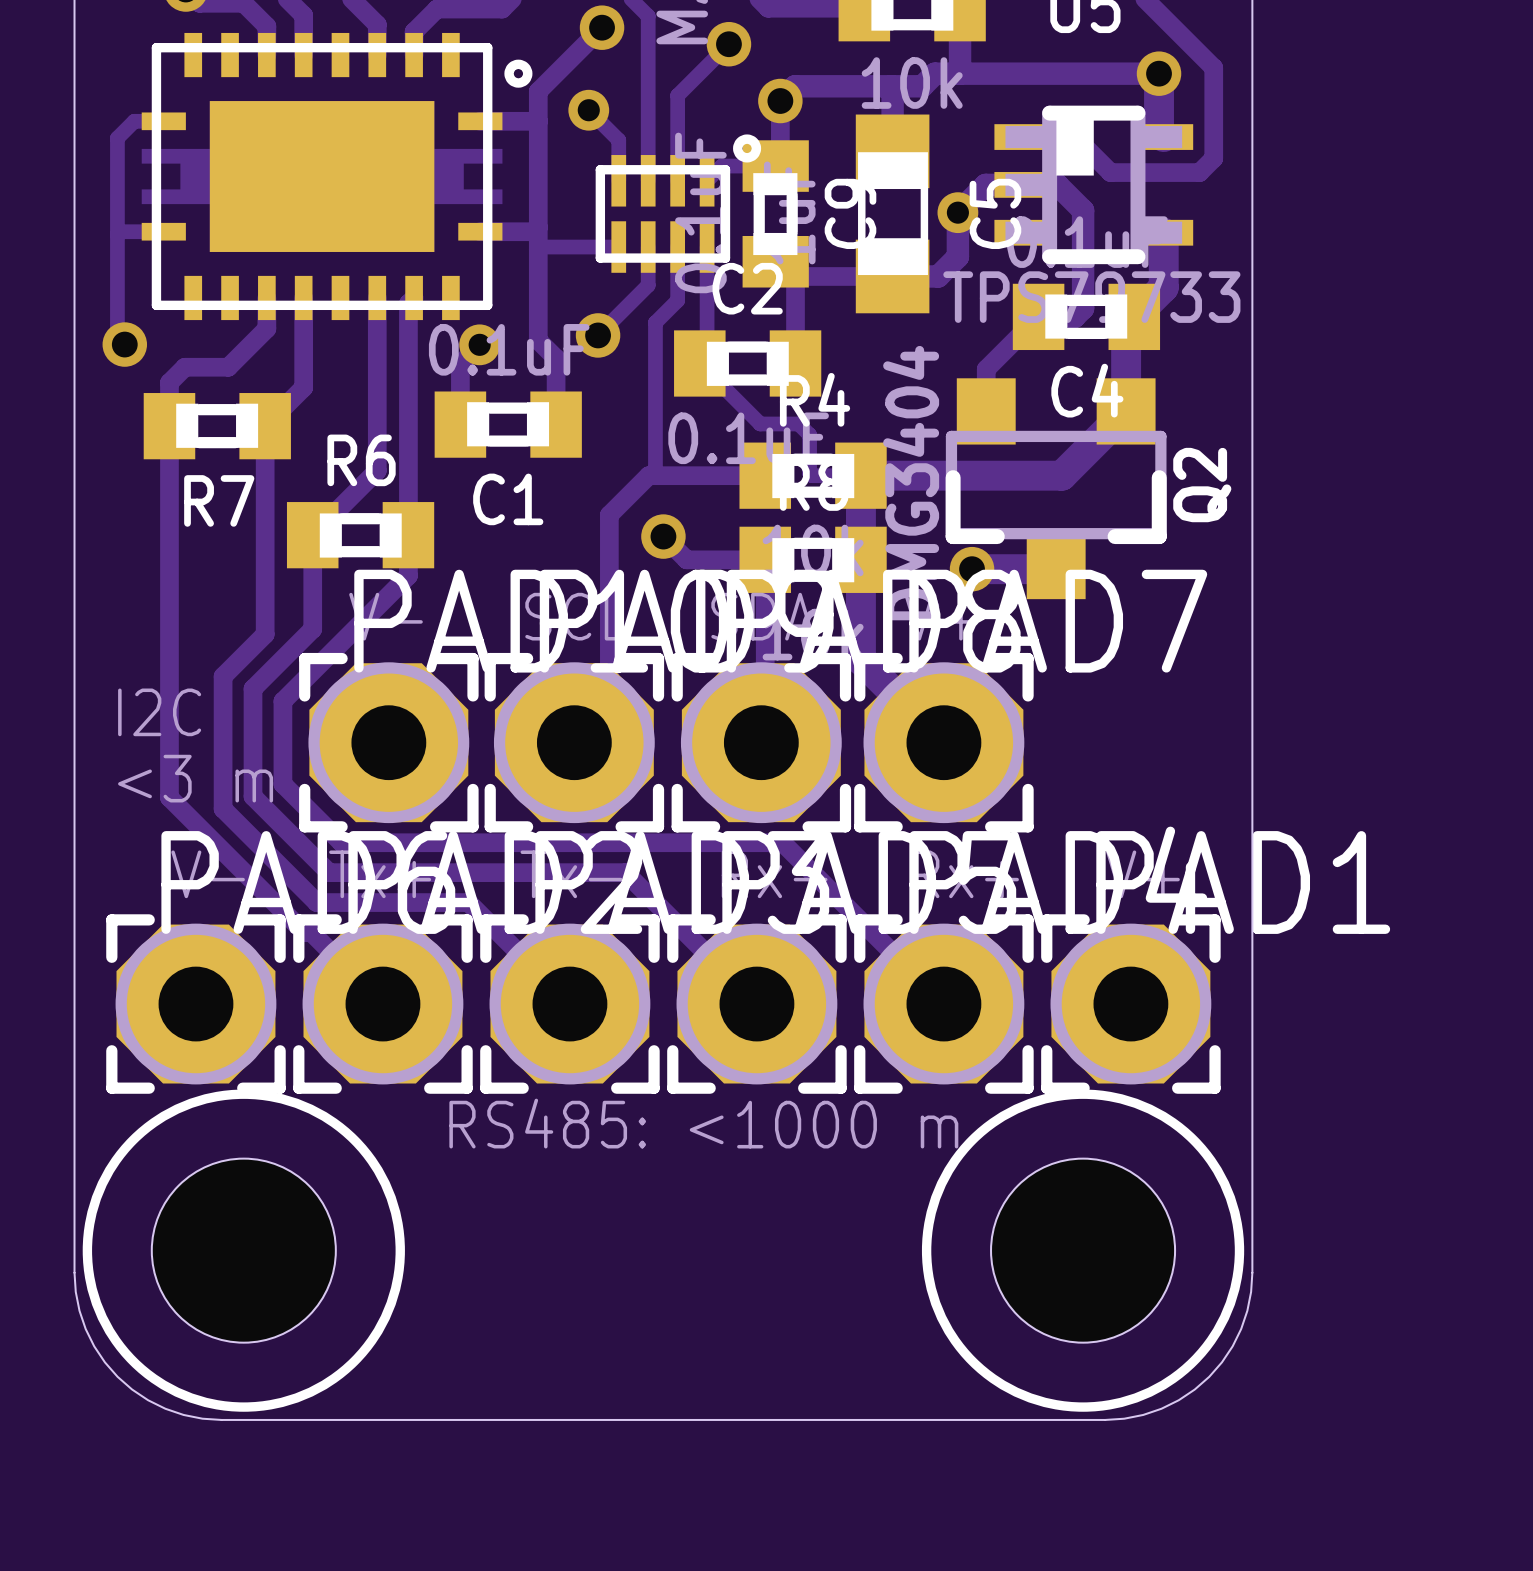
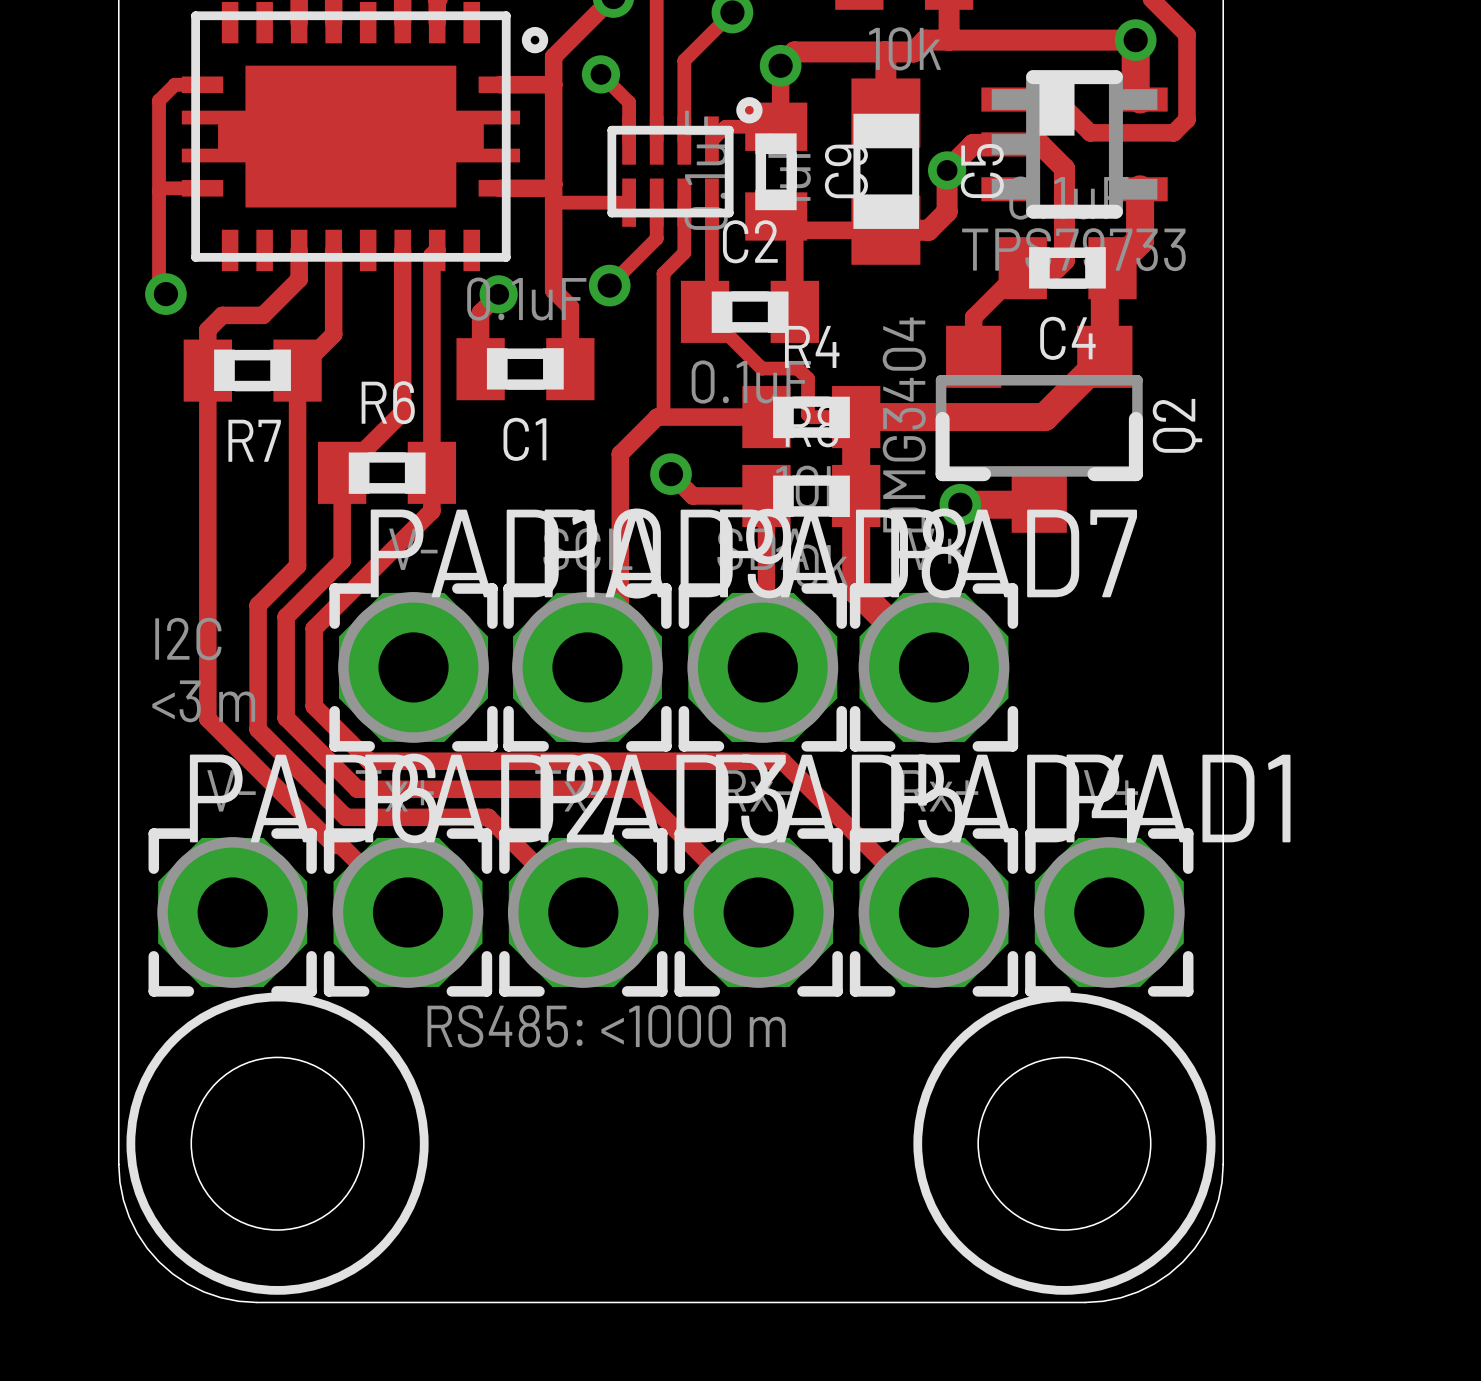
text position: RS485: <1000 m (703, 1123) -> RS485: <1000 m (606, 1026)

